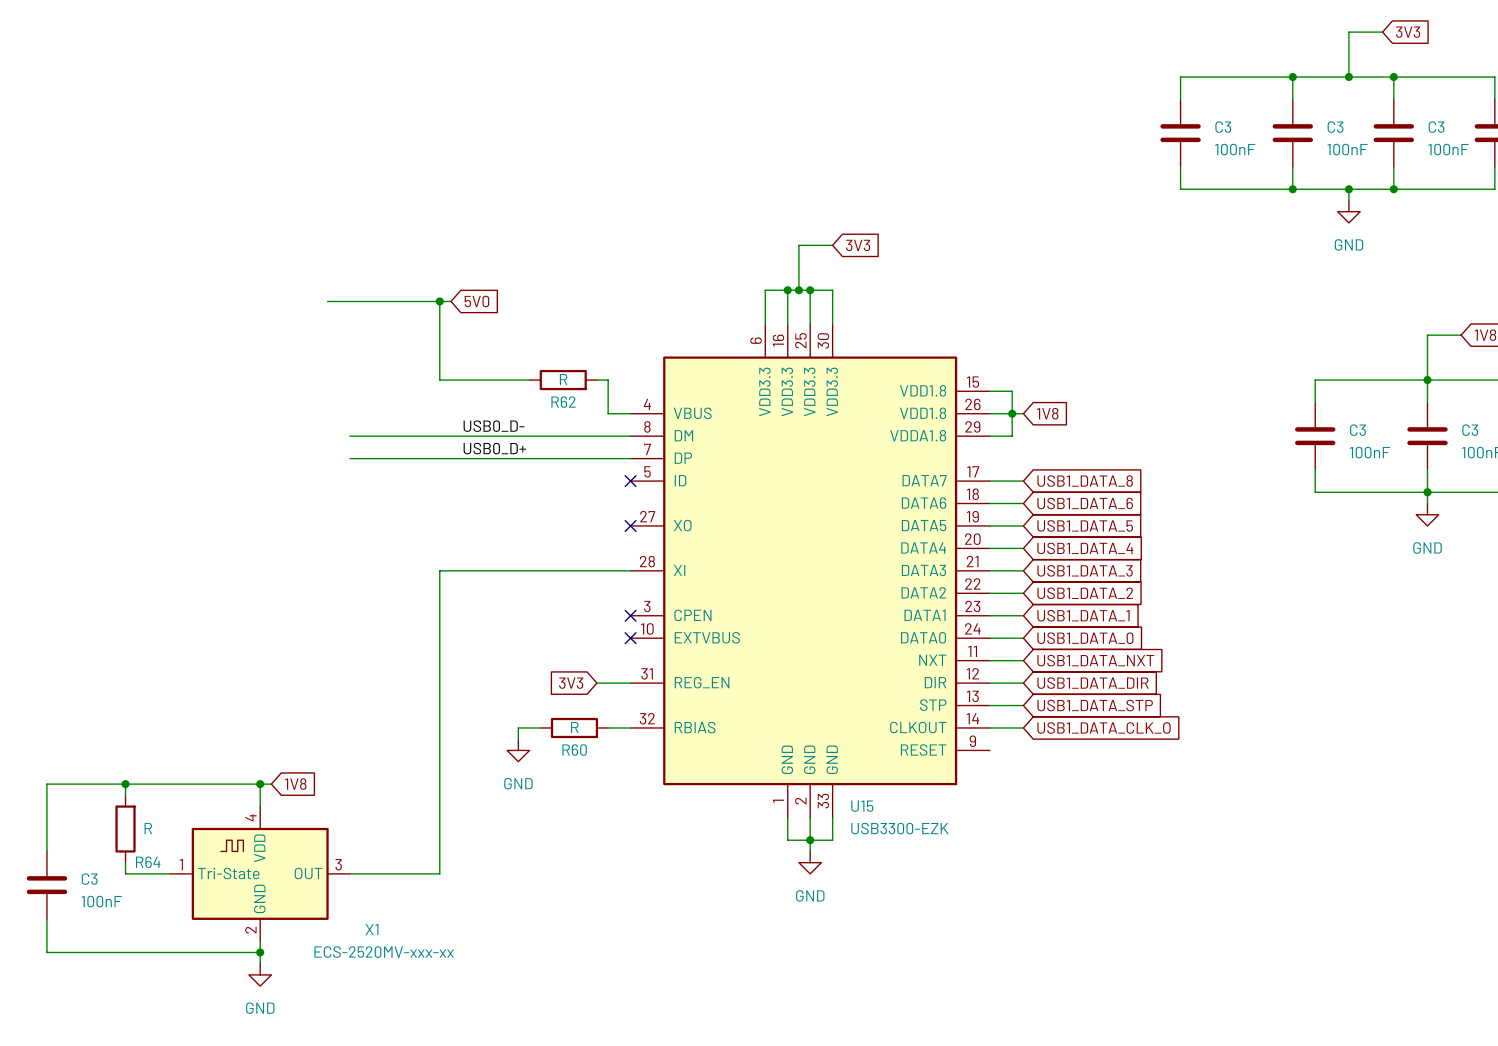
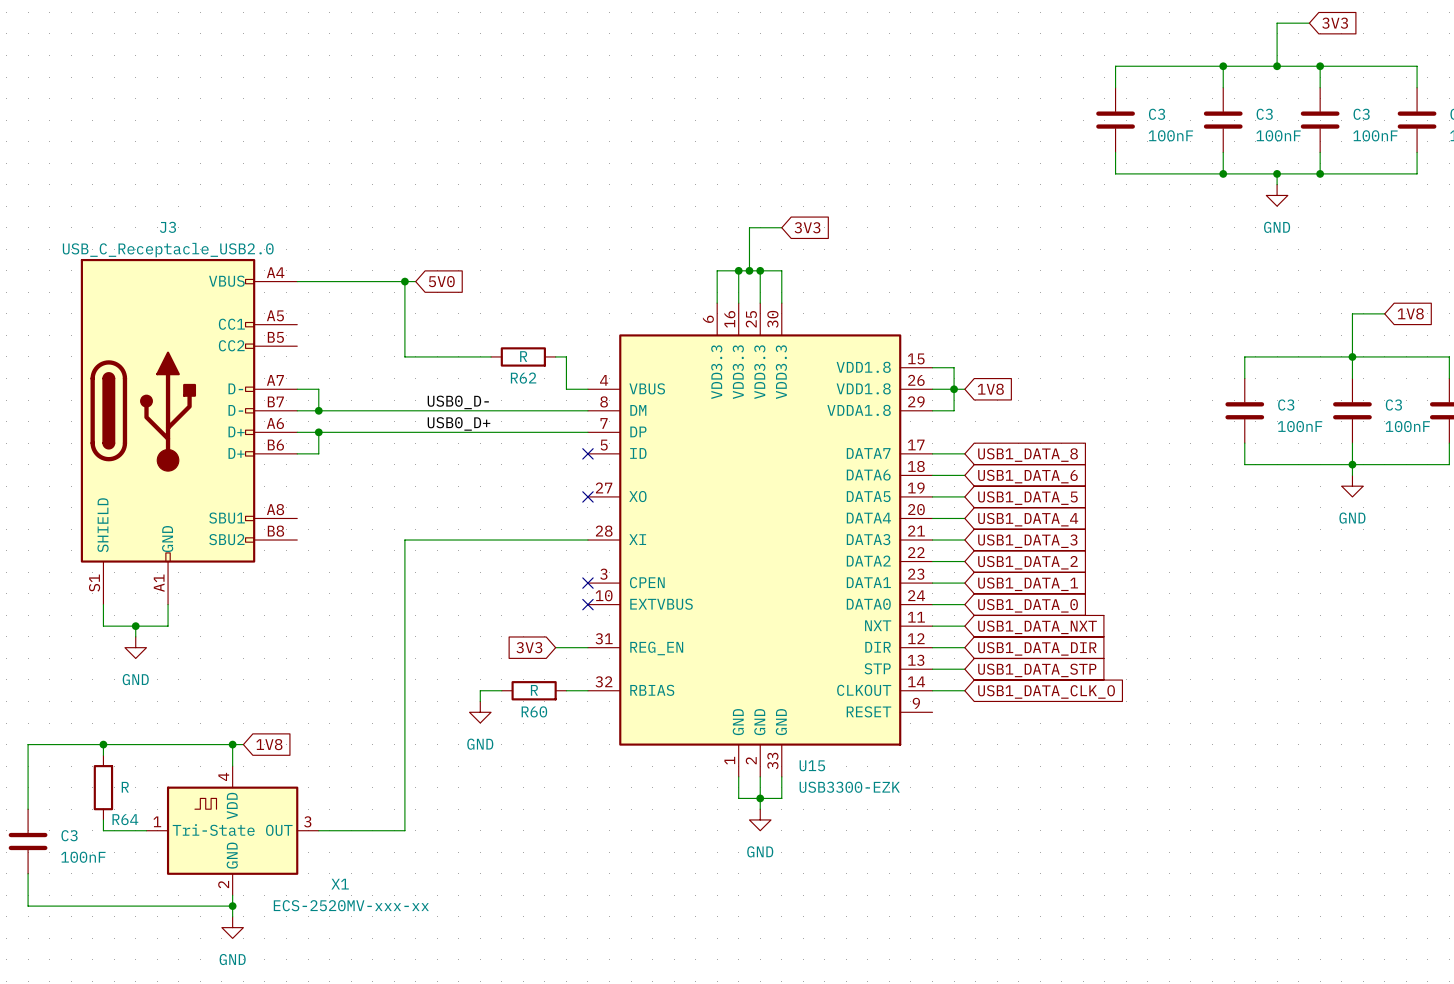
wire: none -> (297, 389) (318, 389) (318, 410) (297, 410)
junction: none -> (318, 410)
J3: none -> USB_C_Receptacle_USB2.0 (189, 431)
wire: none -> (297, 432) (318, 432) (318, 453) (297, 453)
junction: none -> (318, 432)
wire: none -> (103, 604) (103, 626) (168, 626) (168, 604)
wire: none -> (135, 626) (135, 636)
junction: none -> (135, 626)
power symbol: none -> GND (135, 647)

